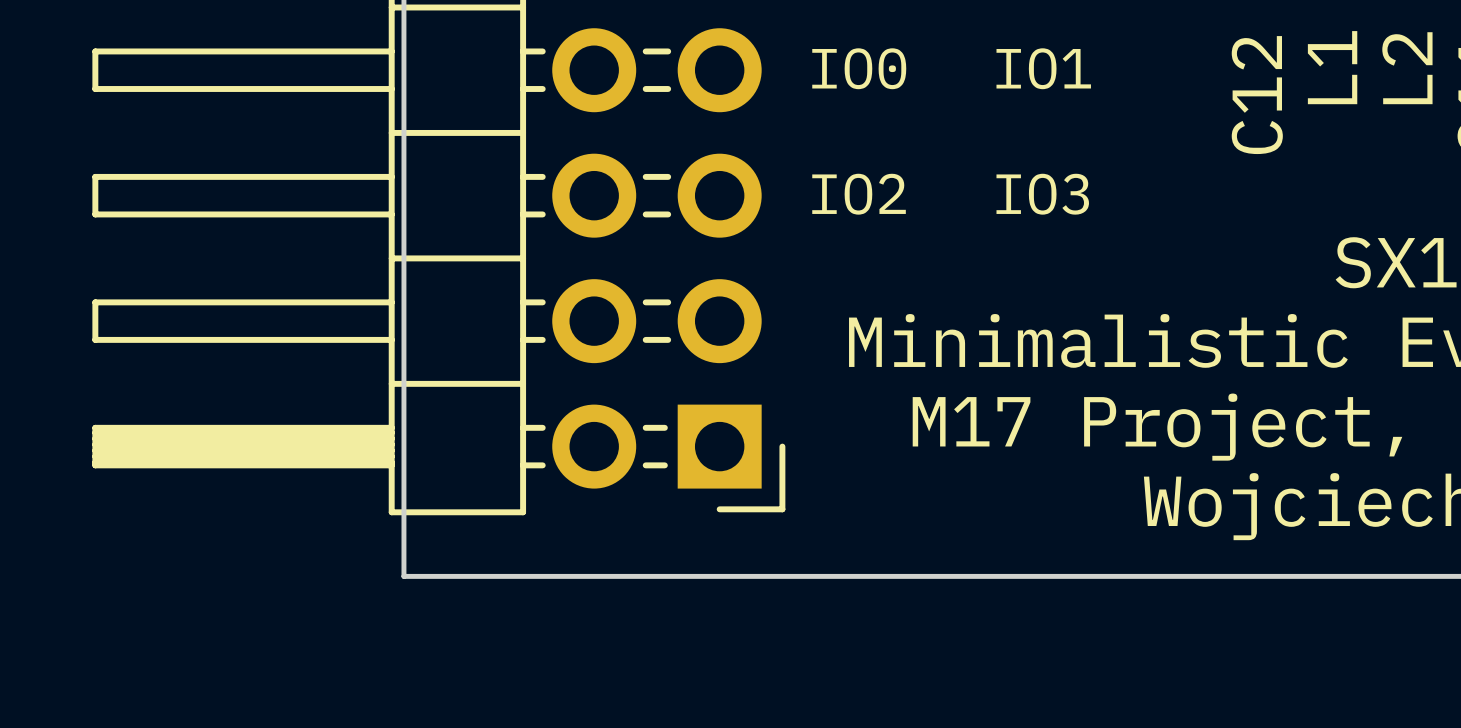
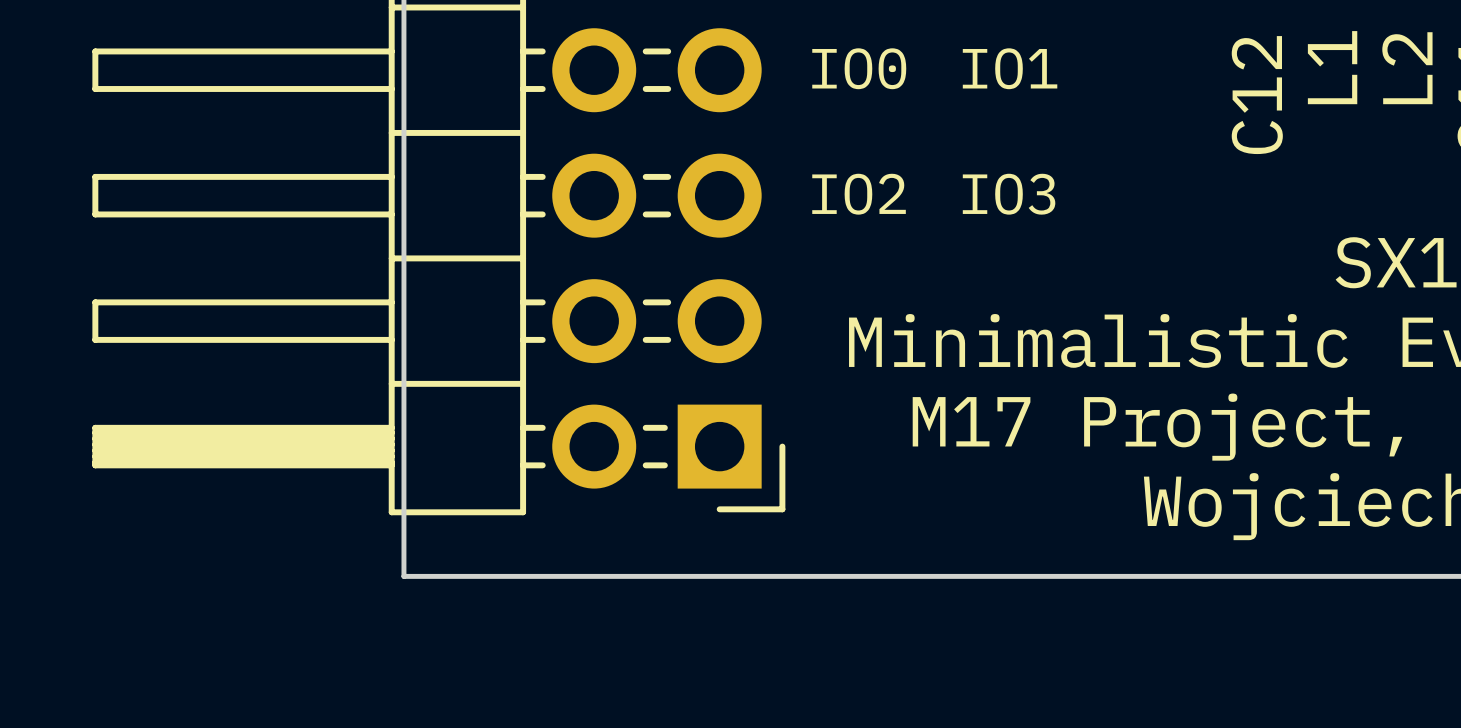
text position: IO1 (1043, 68) -> IO1 (1010, 68)
text position: IO3 (1042, 194) -> IO3 (1009, 194)

